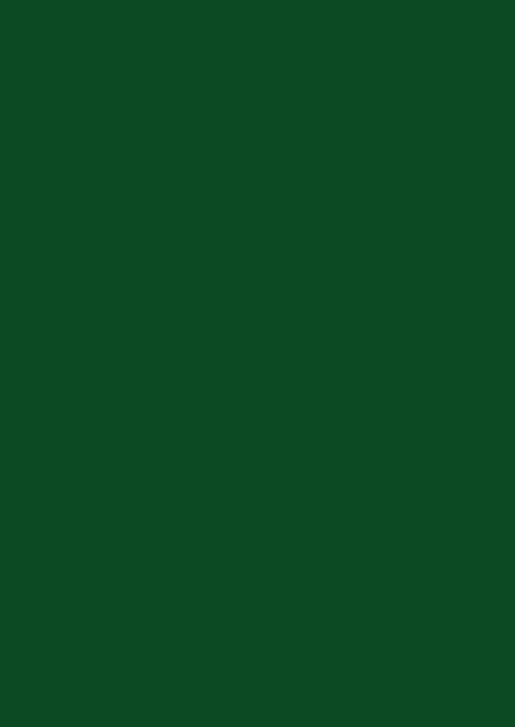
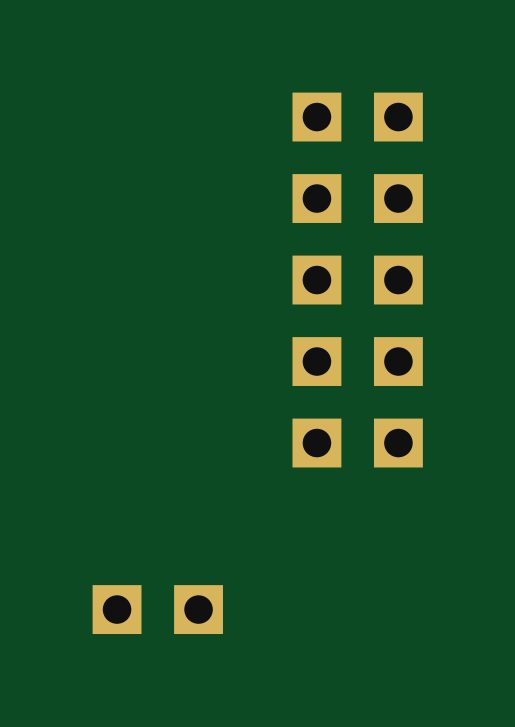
part: none -> (357, 280)
part: none -> (157, 609)

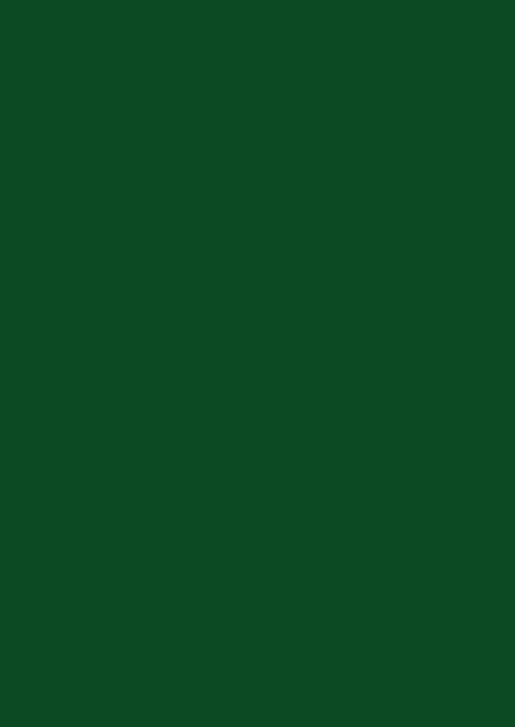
part: (357, 280) -> none
part: (157, 609) -> none

